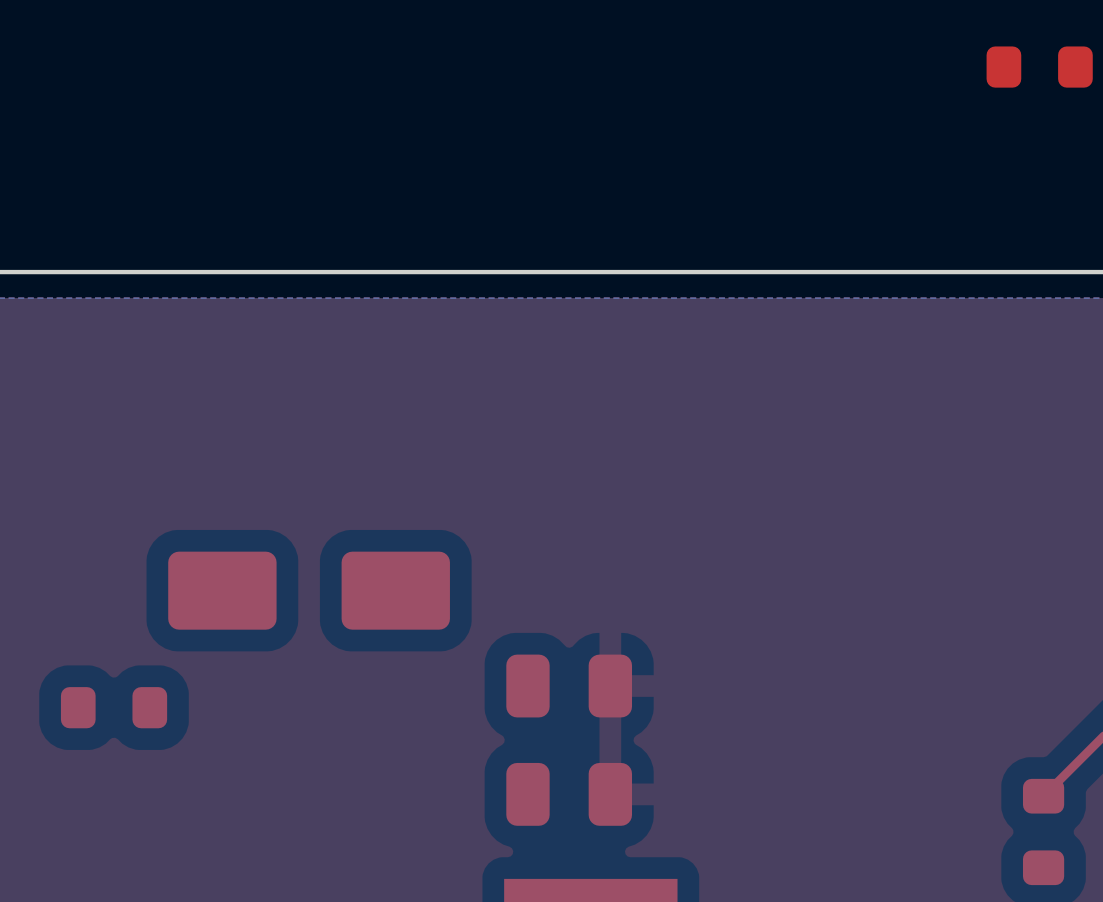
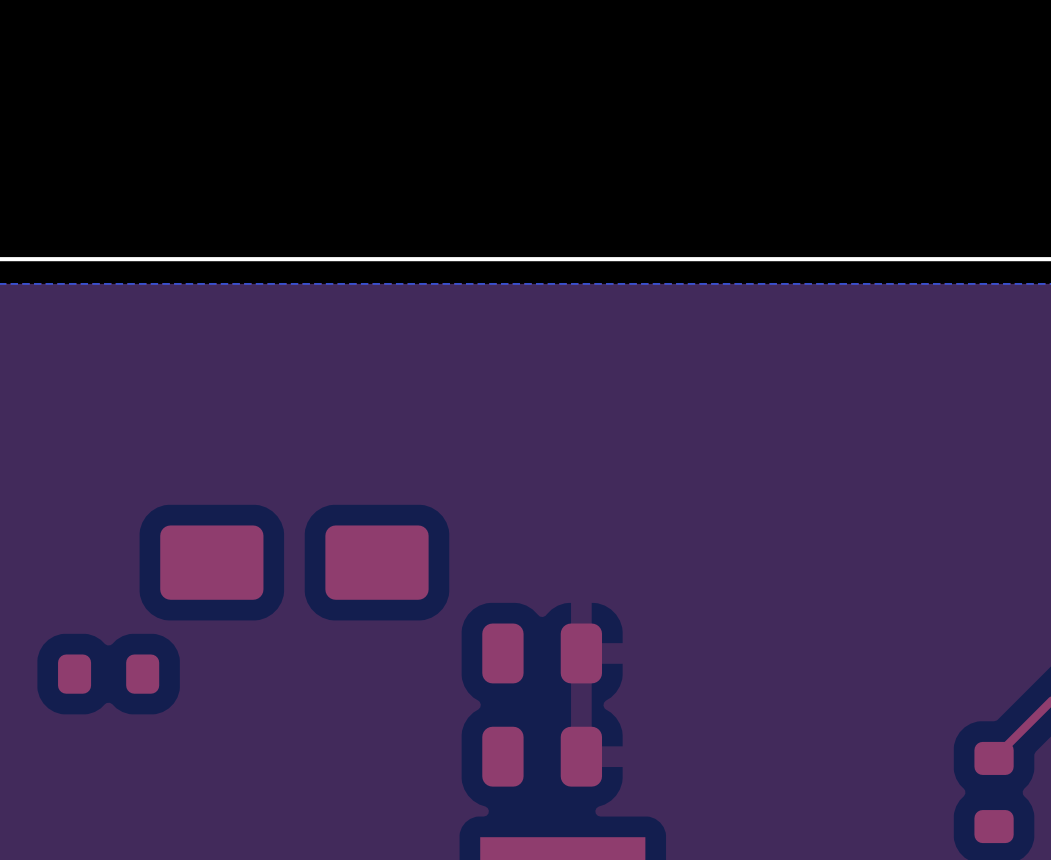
part: (1039, 67) -> none

